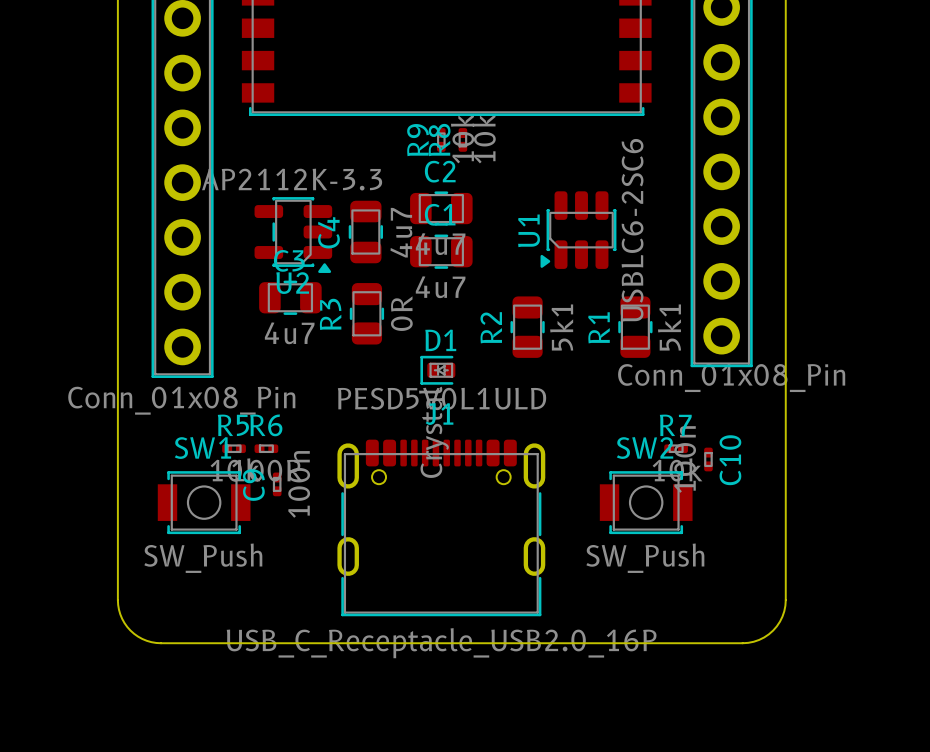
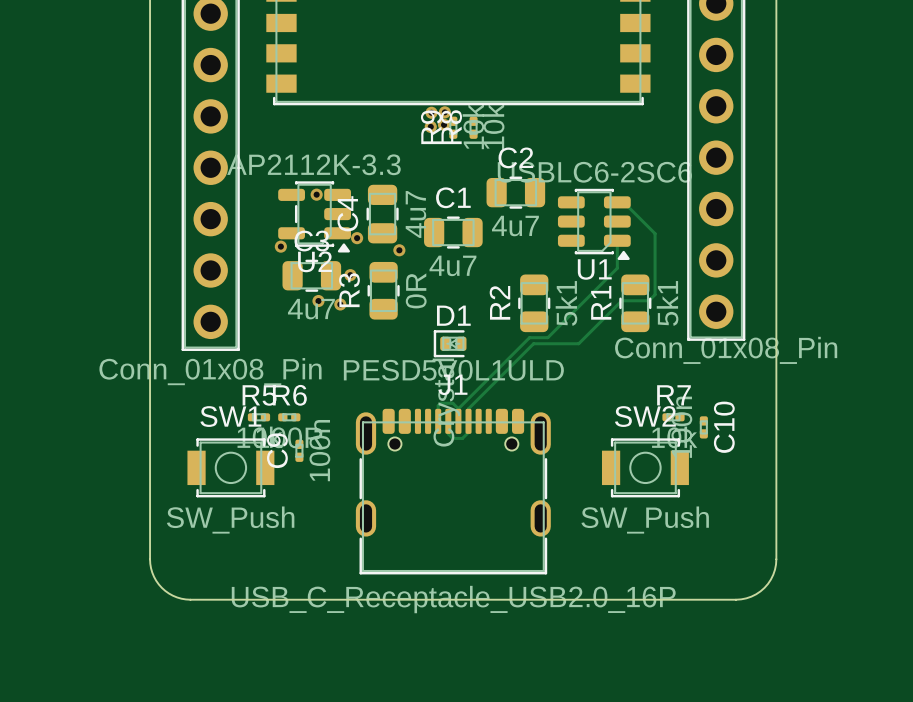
via: none -> (431, 112)
via: none -> (444, 112)
via: none -> (444, 124)
via: none -> (430, 126)
C2 position: (441, 208) -> (515, 192)
via: none -> (316, 194)
track: none -> (617, 202) (623, 202) (655, 233) (655, 294) (648, 300) (621, 300) (578, 343) (533, 343) (468, 408) (468, 432) (462, 438) (452, 438) (448, 433) (448, 421)
U1 rotation: 0° (578, 230) -> 90° counterclockwise (594, 224)
via: none -> (357, 238)
track: none -> (617, 240) (617, 268) (547, 337) (529, 337) (458, 408)
via: none -> (280, 246)
via: none -> (399, 250)
via: none -> (350, 275)
via: none -> (318, 301)
via: none -> (340, 304)
track: none -> (458, 408) (452, 403) (440, 403) (438, 405) (438, 421)

